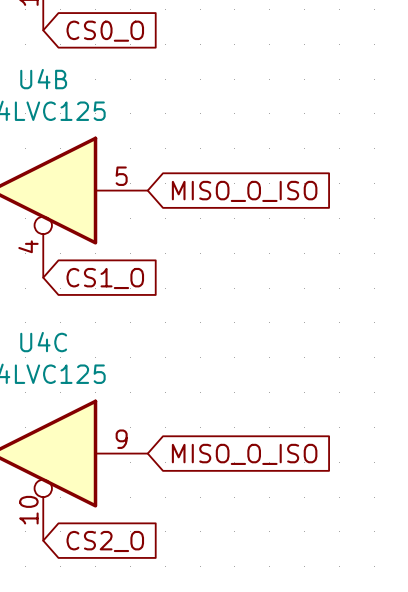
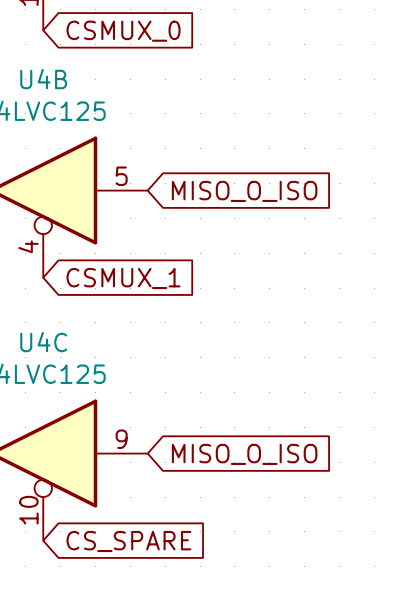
global label: CS0_O (105, 31) -> CSMUX_0 (123, 31)
global label: CS1_O (105, 278) -> CSMUX_1 (123, 278)
global label: CS2_O (105, 541) -> CS_SPARE (128, 541)

